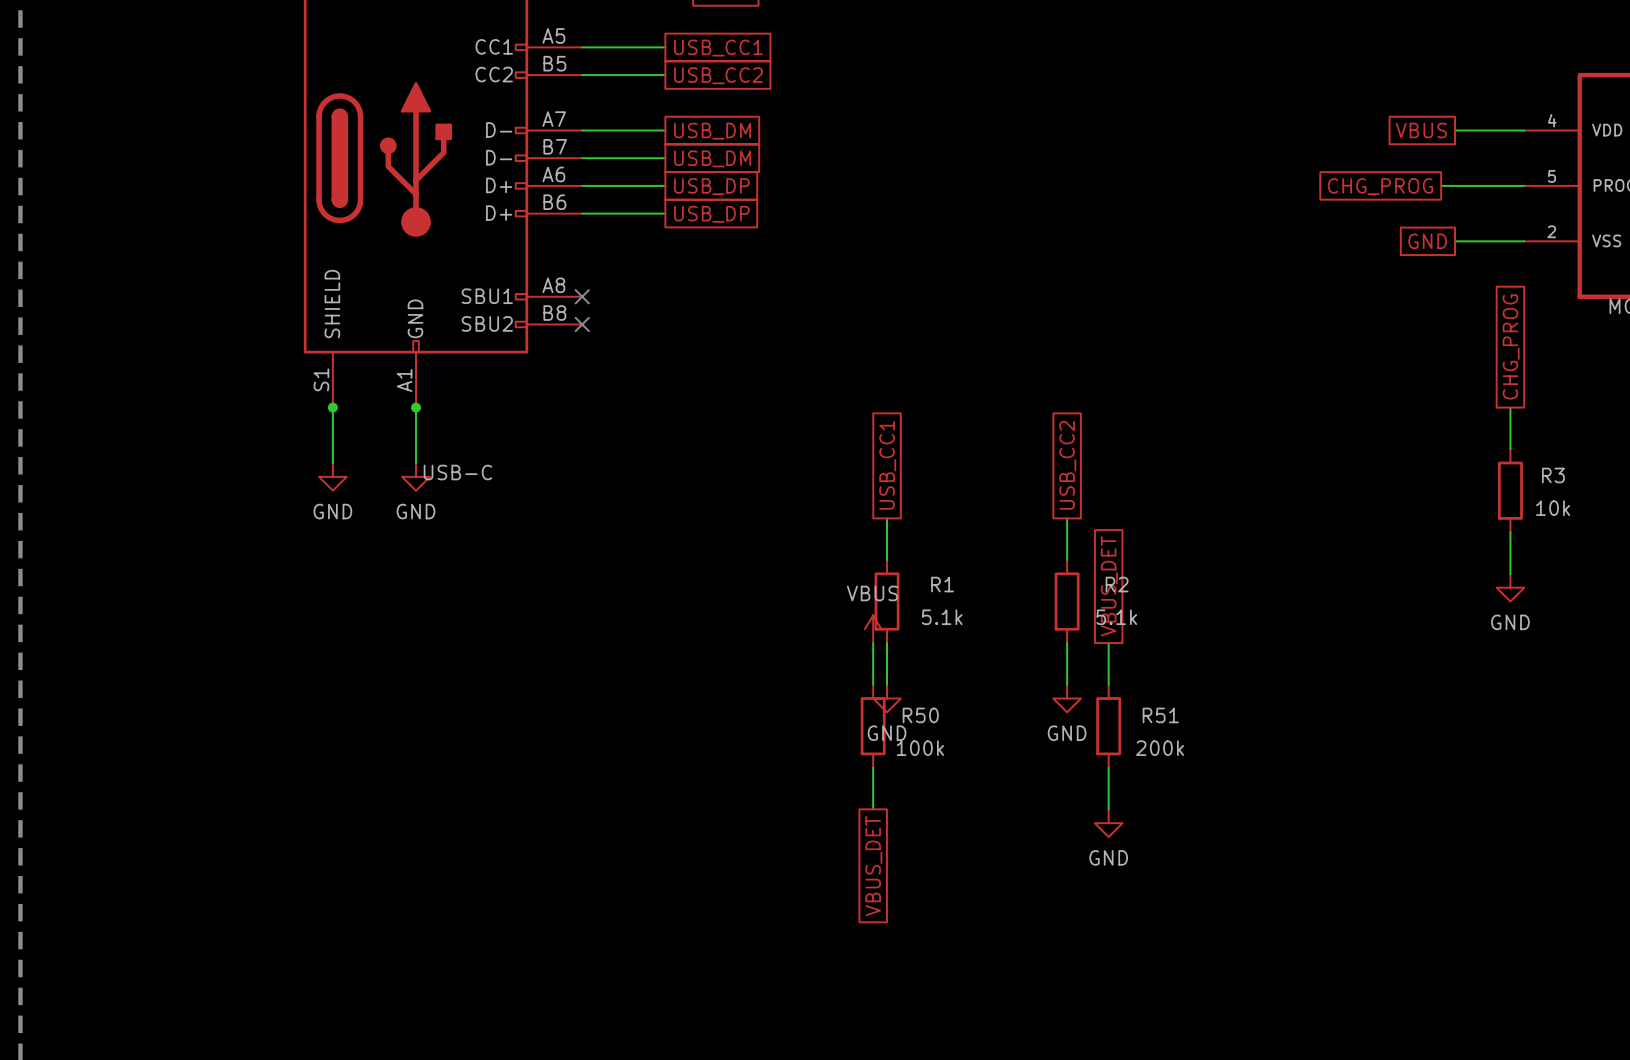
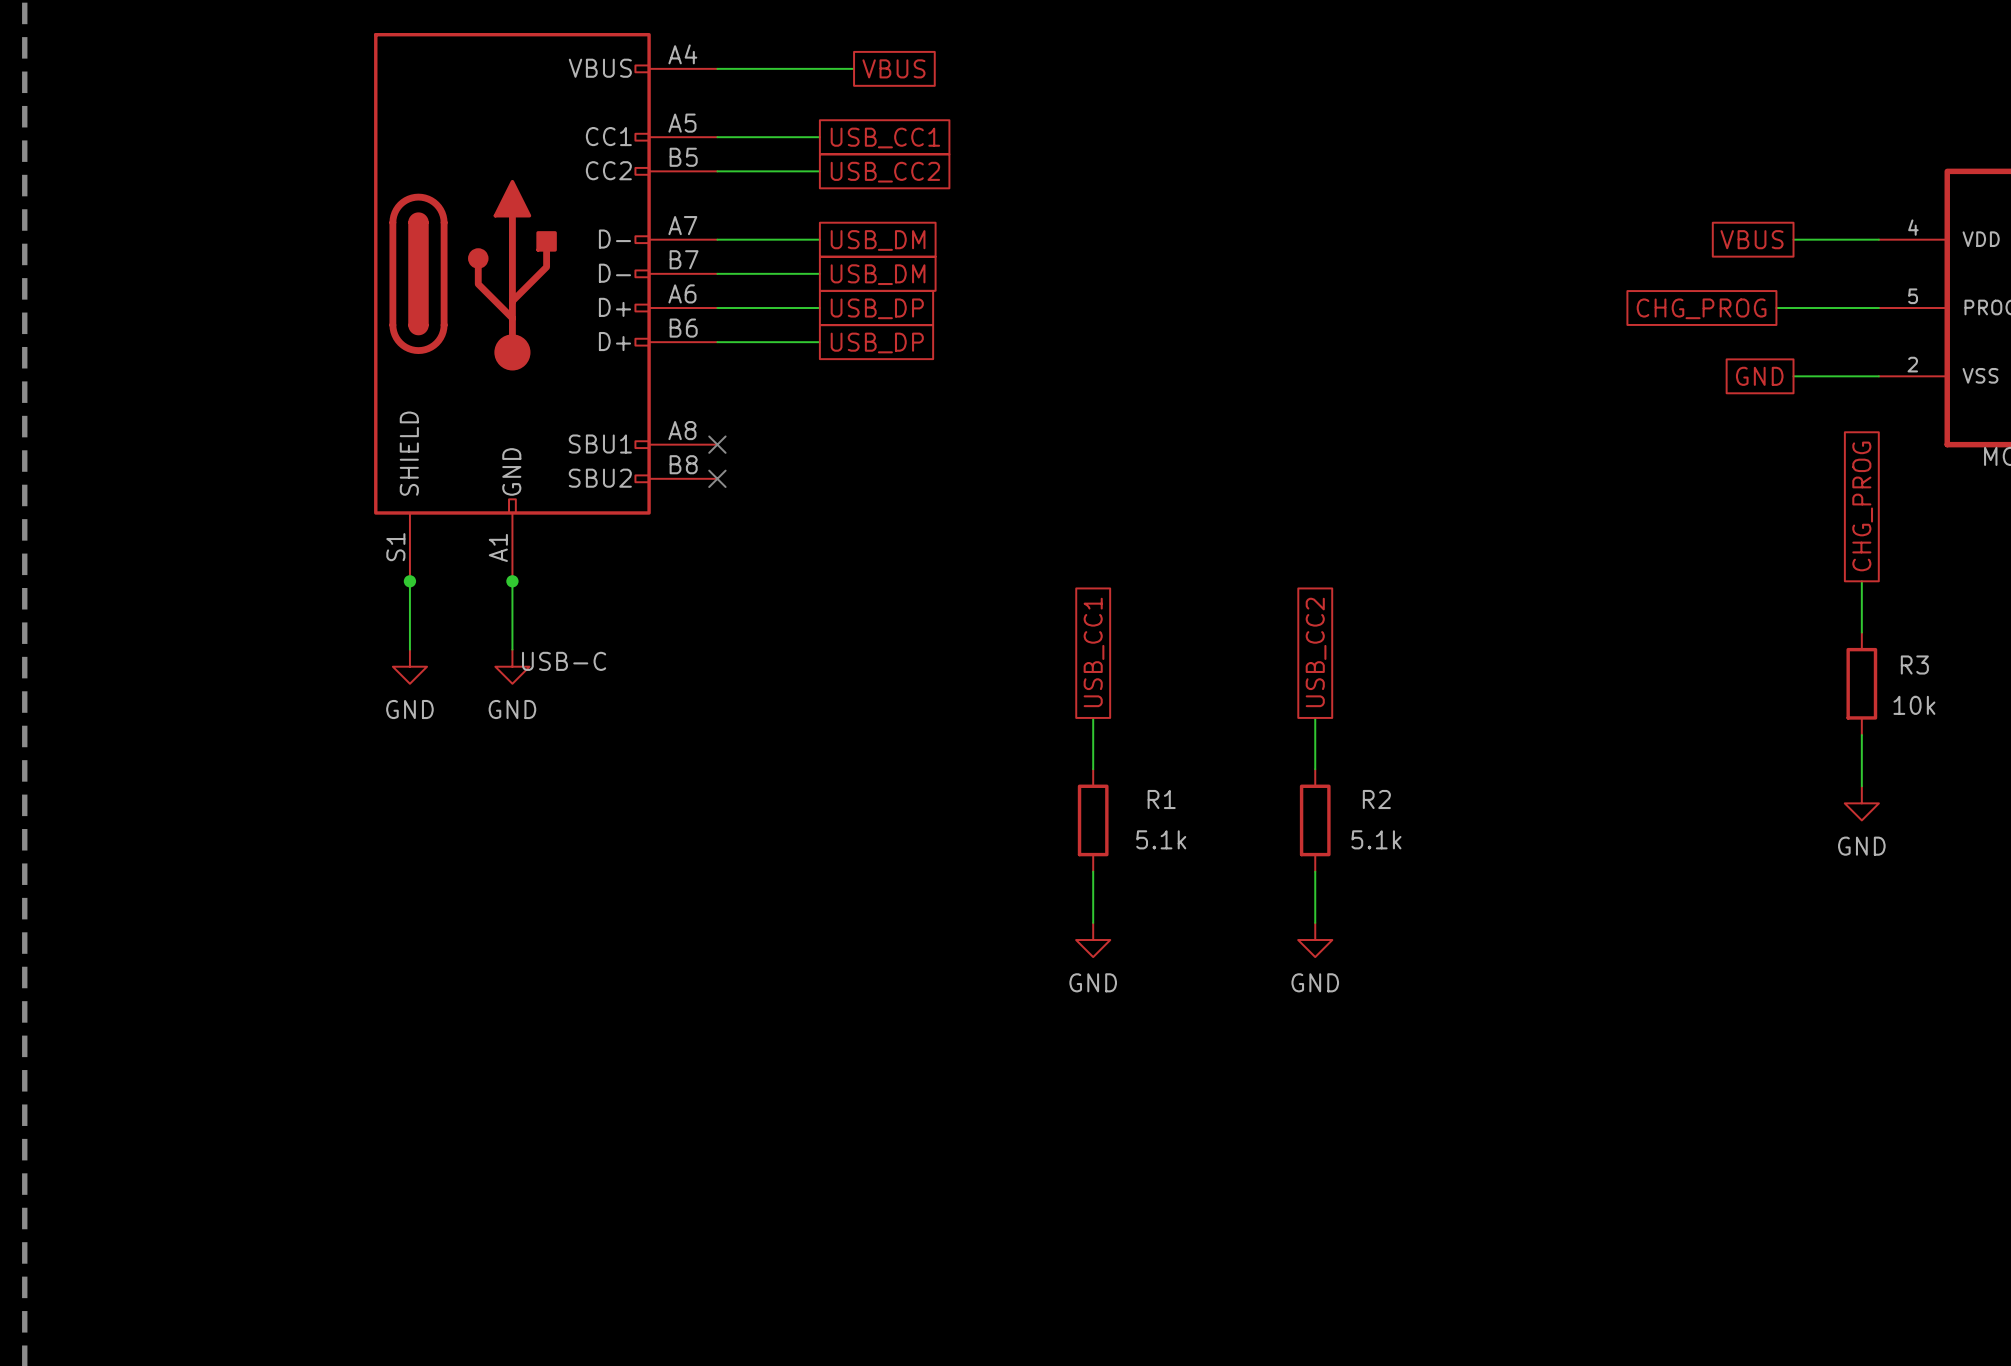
global label: VBUS_DET (1109, 586) -> none
power symbol: VBUS (873, 629) -> none
wire: (873, 643) (873, 684) -> none
wire: (1108, 643) (1108, 684) -> none
R50: 100k (873, 726) -> none
R51: 200k (1108, 726) -> none
wire: (873, 767) (873, 809) -> none
wire: (1108, 767) (1108, 809) -> none
power symbol: GND (1108, 823) -> none
global label: VBUS_DET (873, 866) -> none

